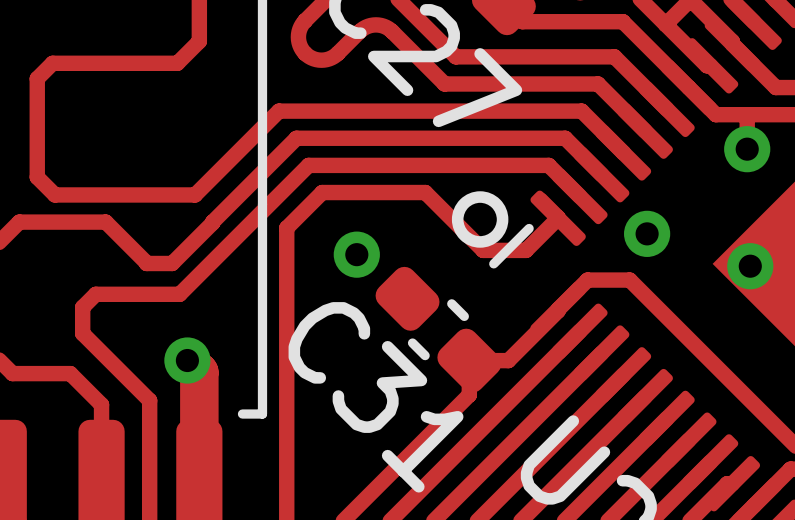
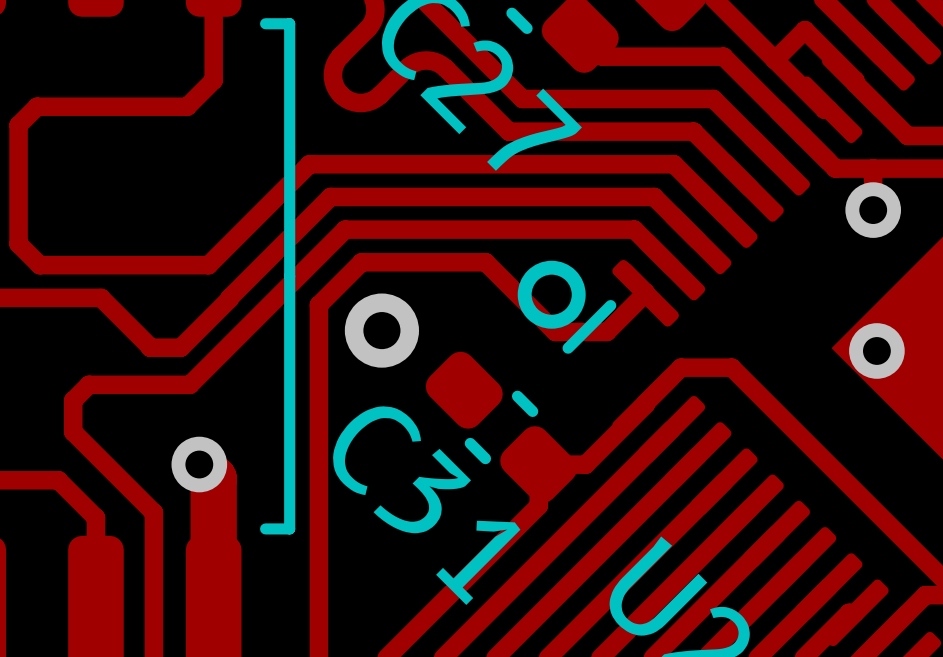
via size: [333, 231, 380, 278] -> [344, 293, 420, 368]
via: (647, 233) -> none

